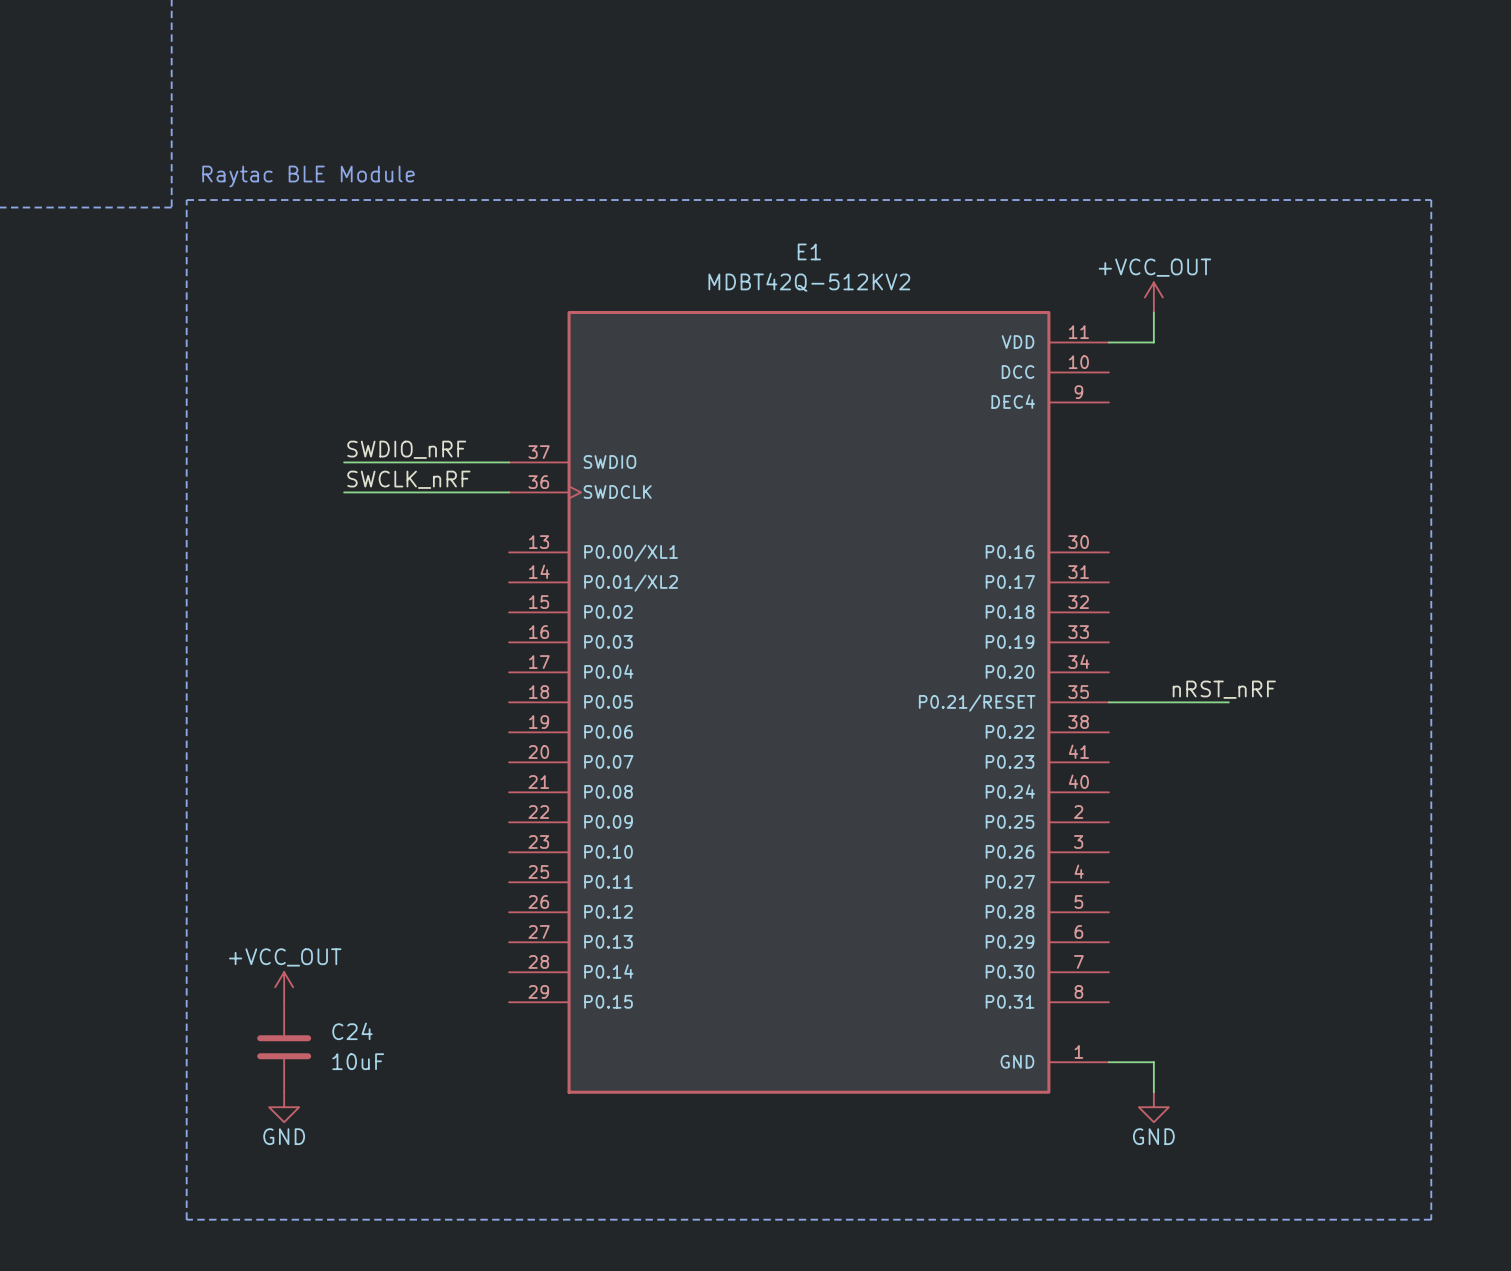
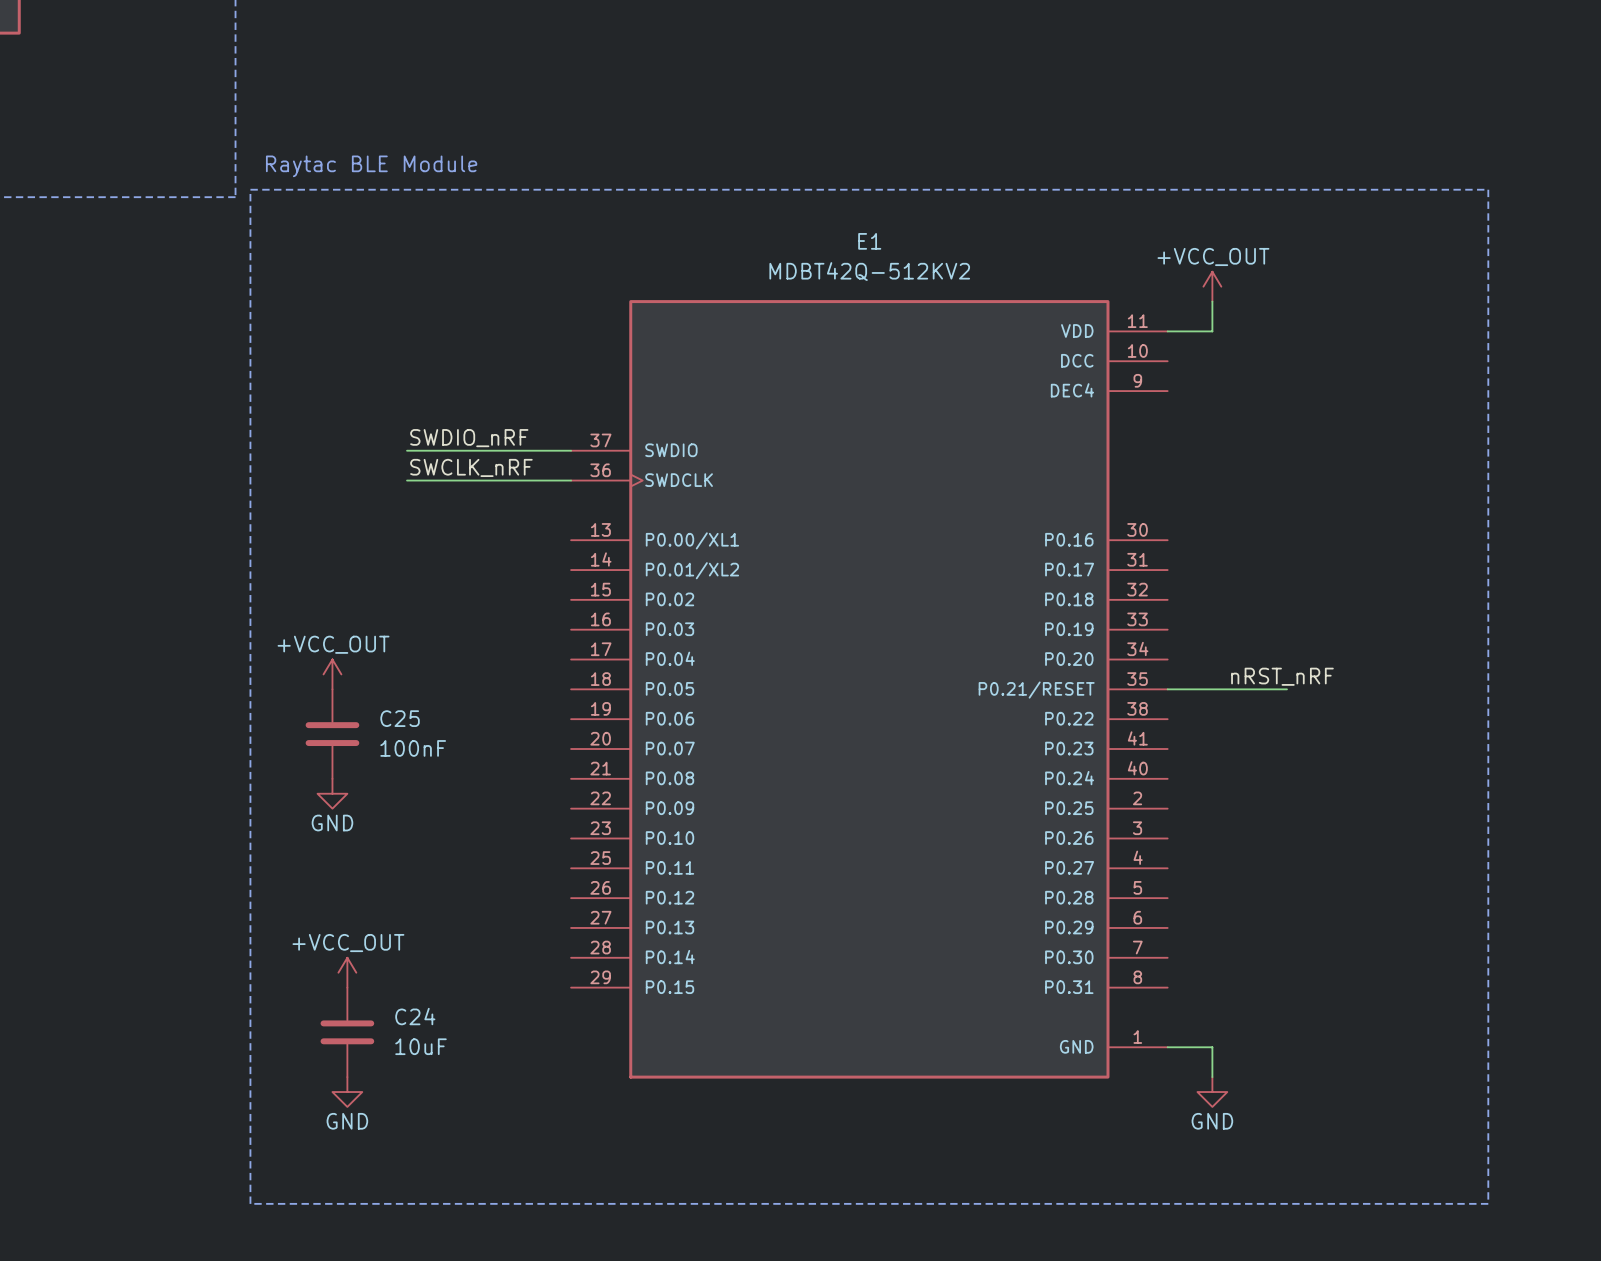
power symbol: none -> +VCC_OUT (332, 674)
C25: none -> 100nF (332, 734)
power symbol: none -> GND (332, 793)

